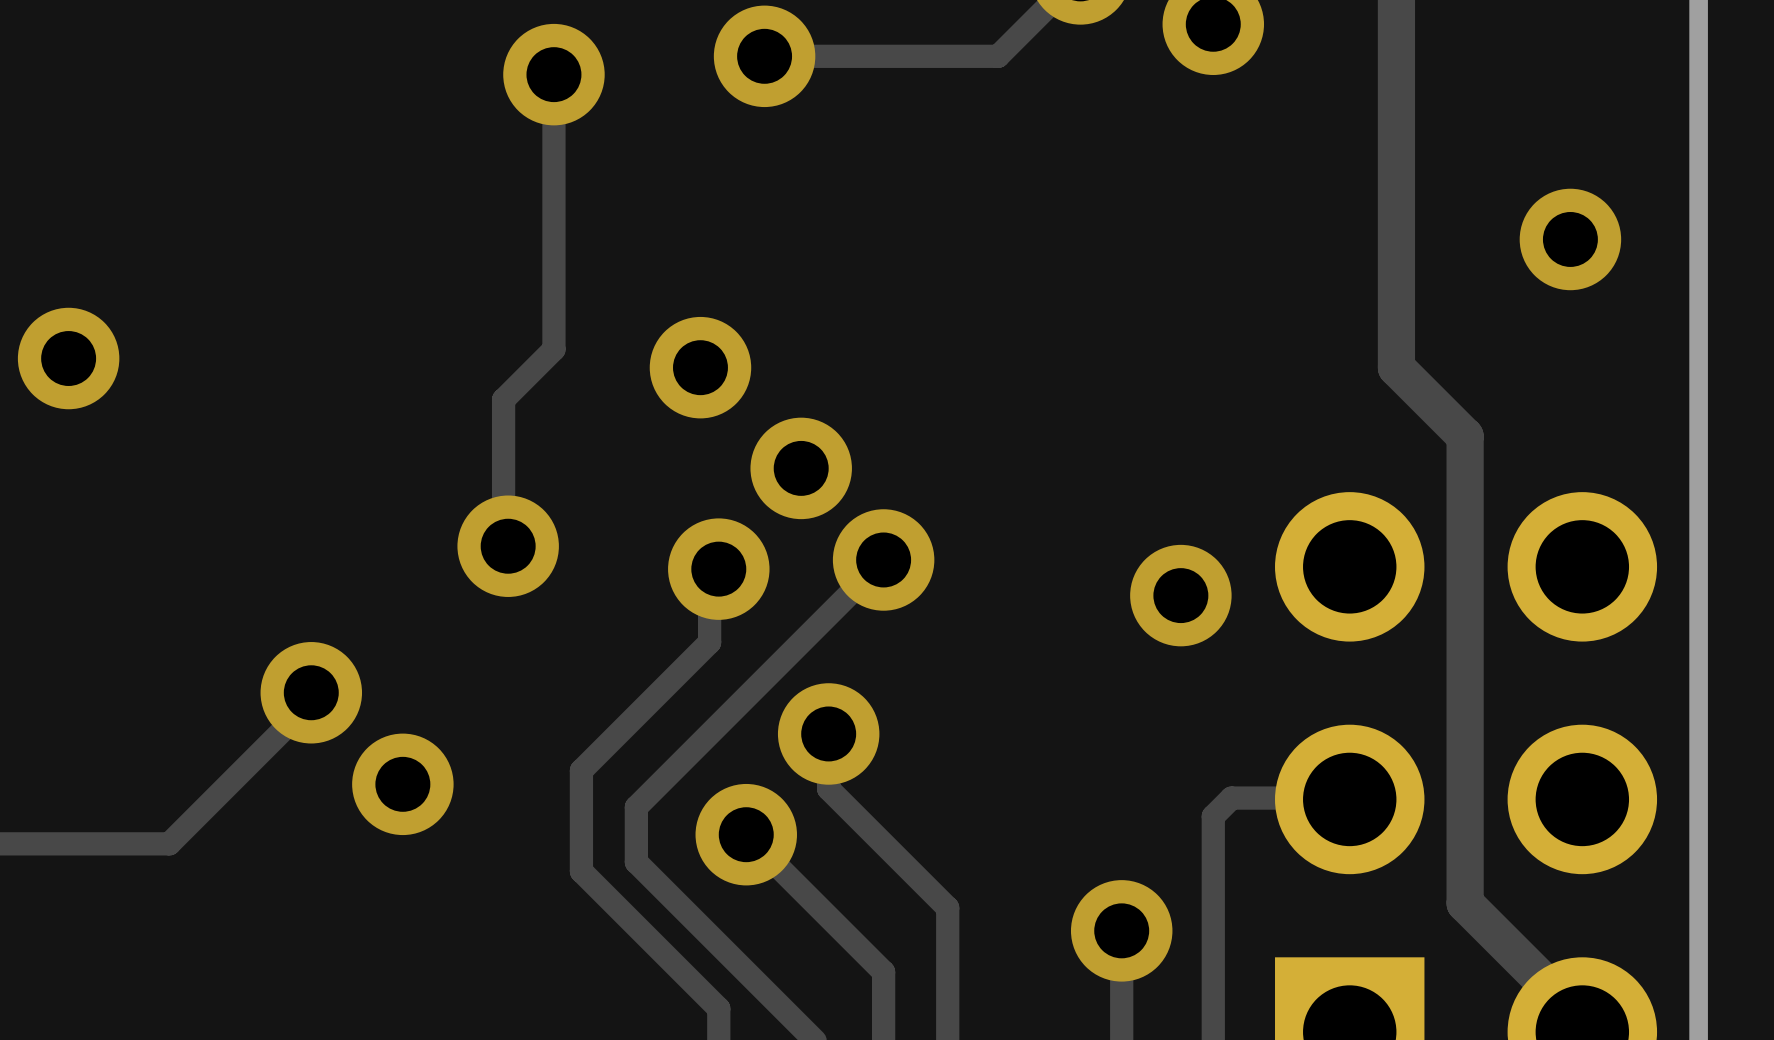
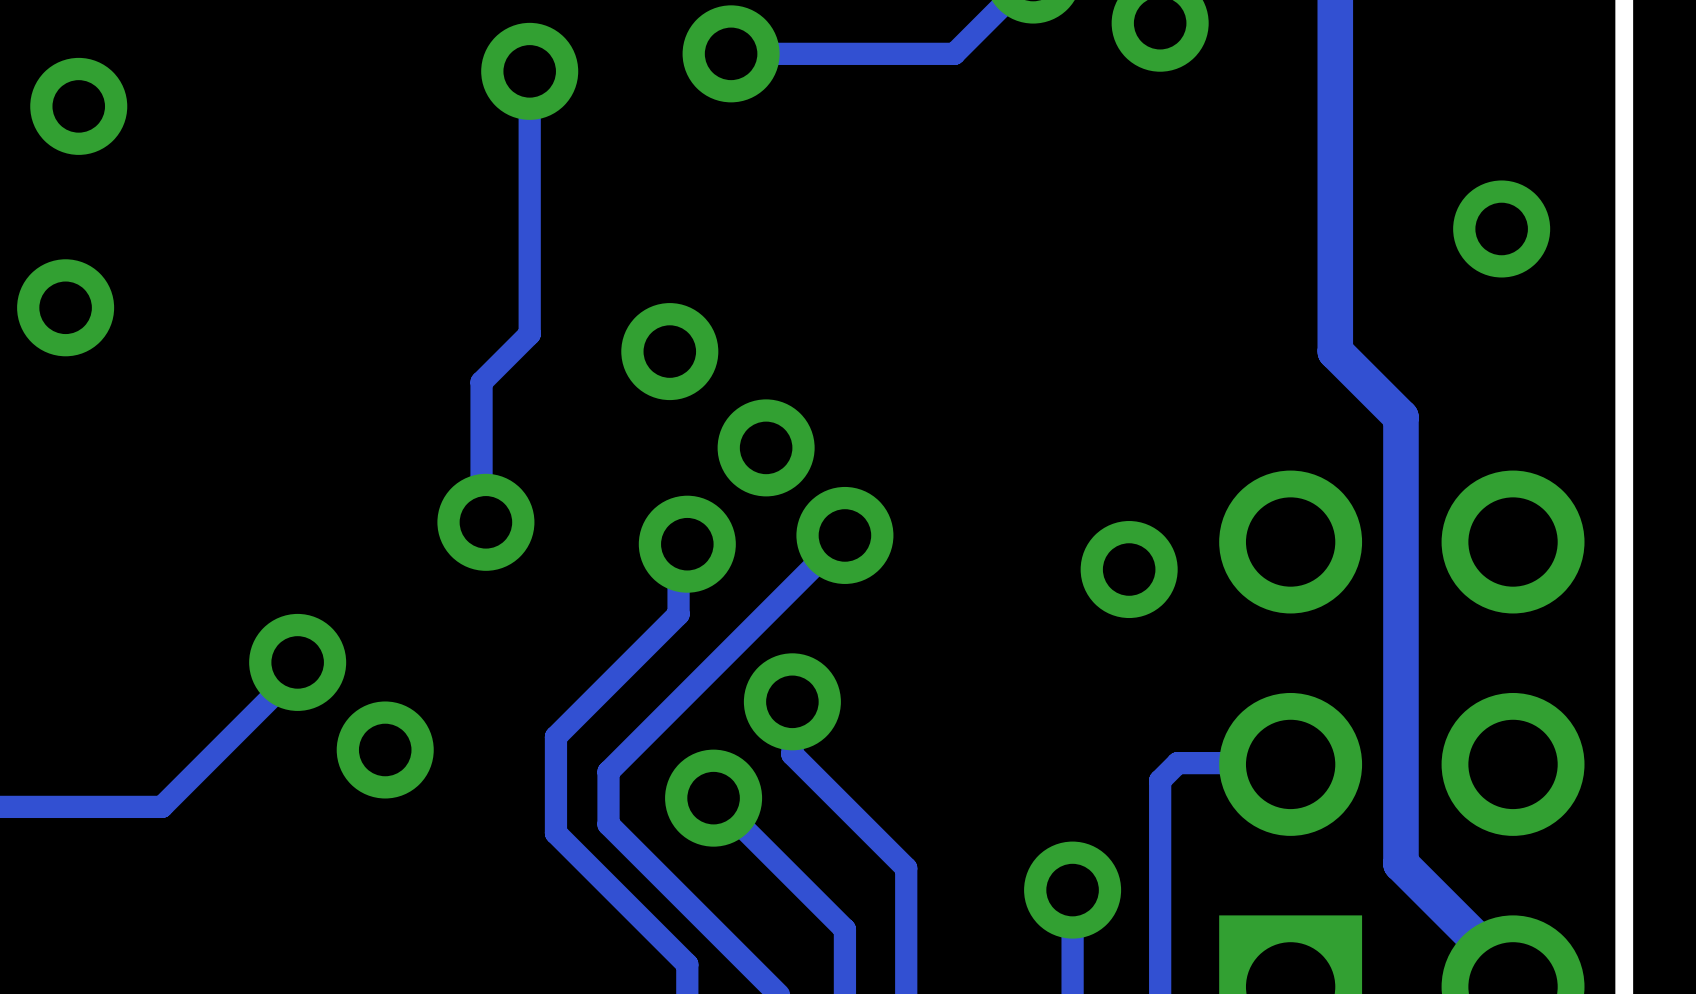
via: none -> (78, 106)
via position: (68, 358) -> (65, 307)

